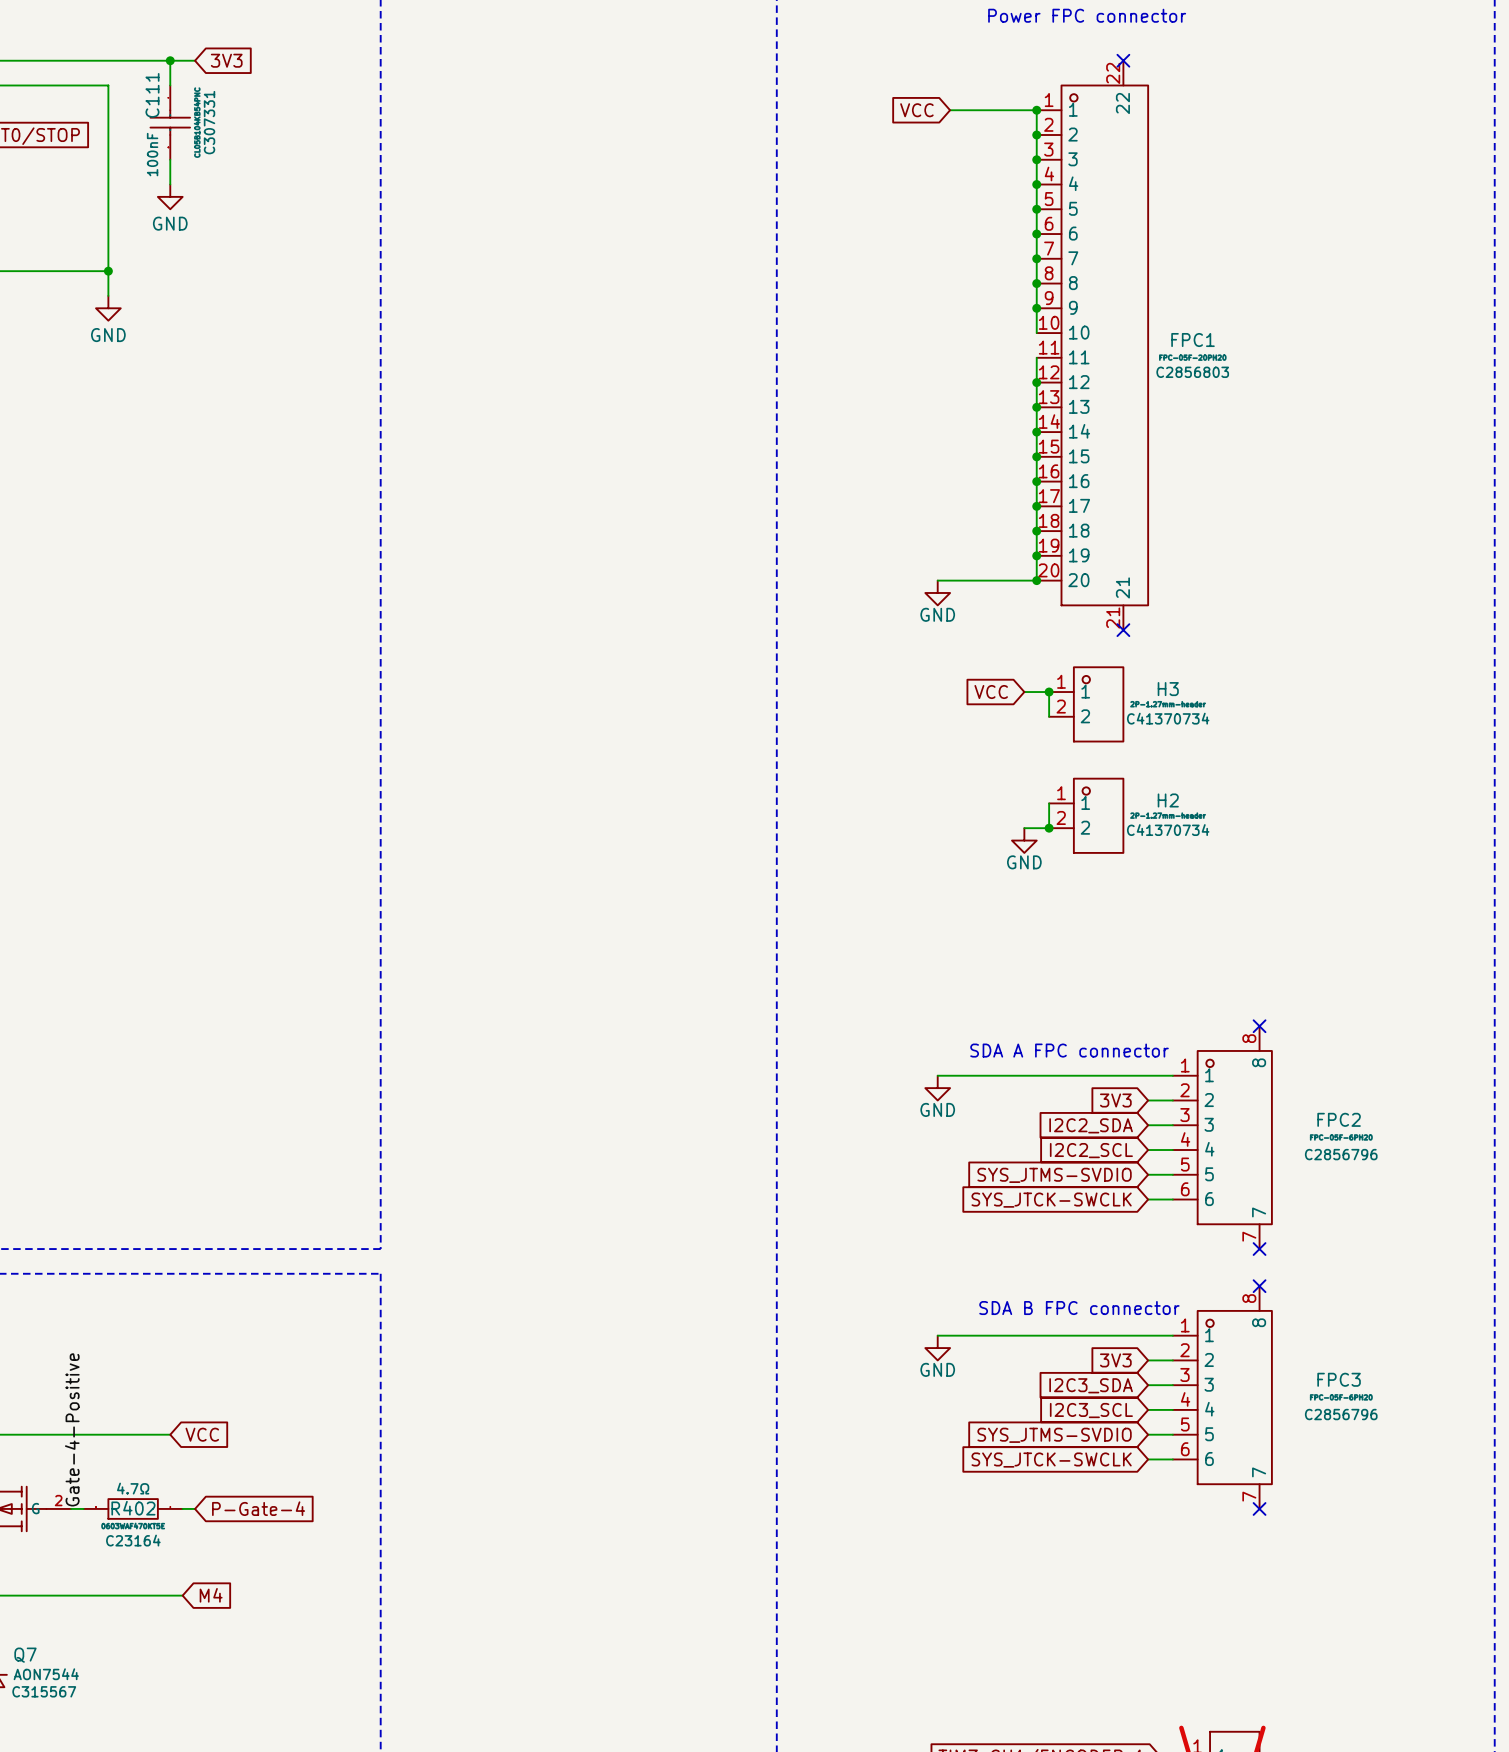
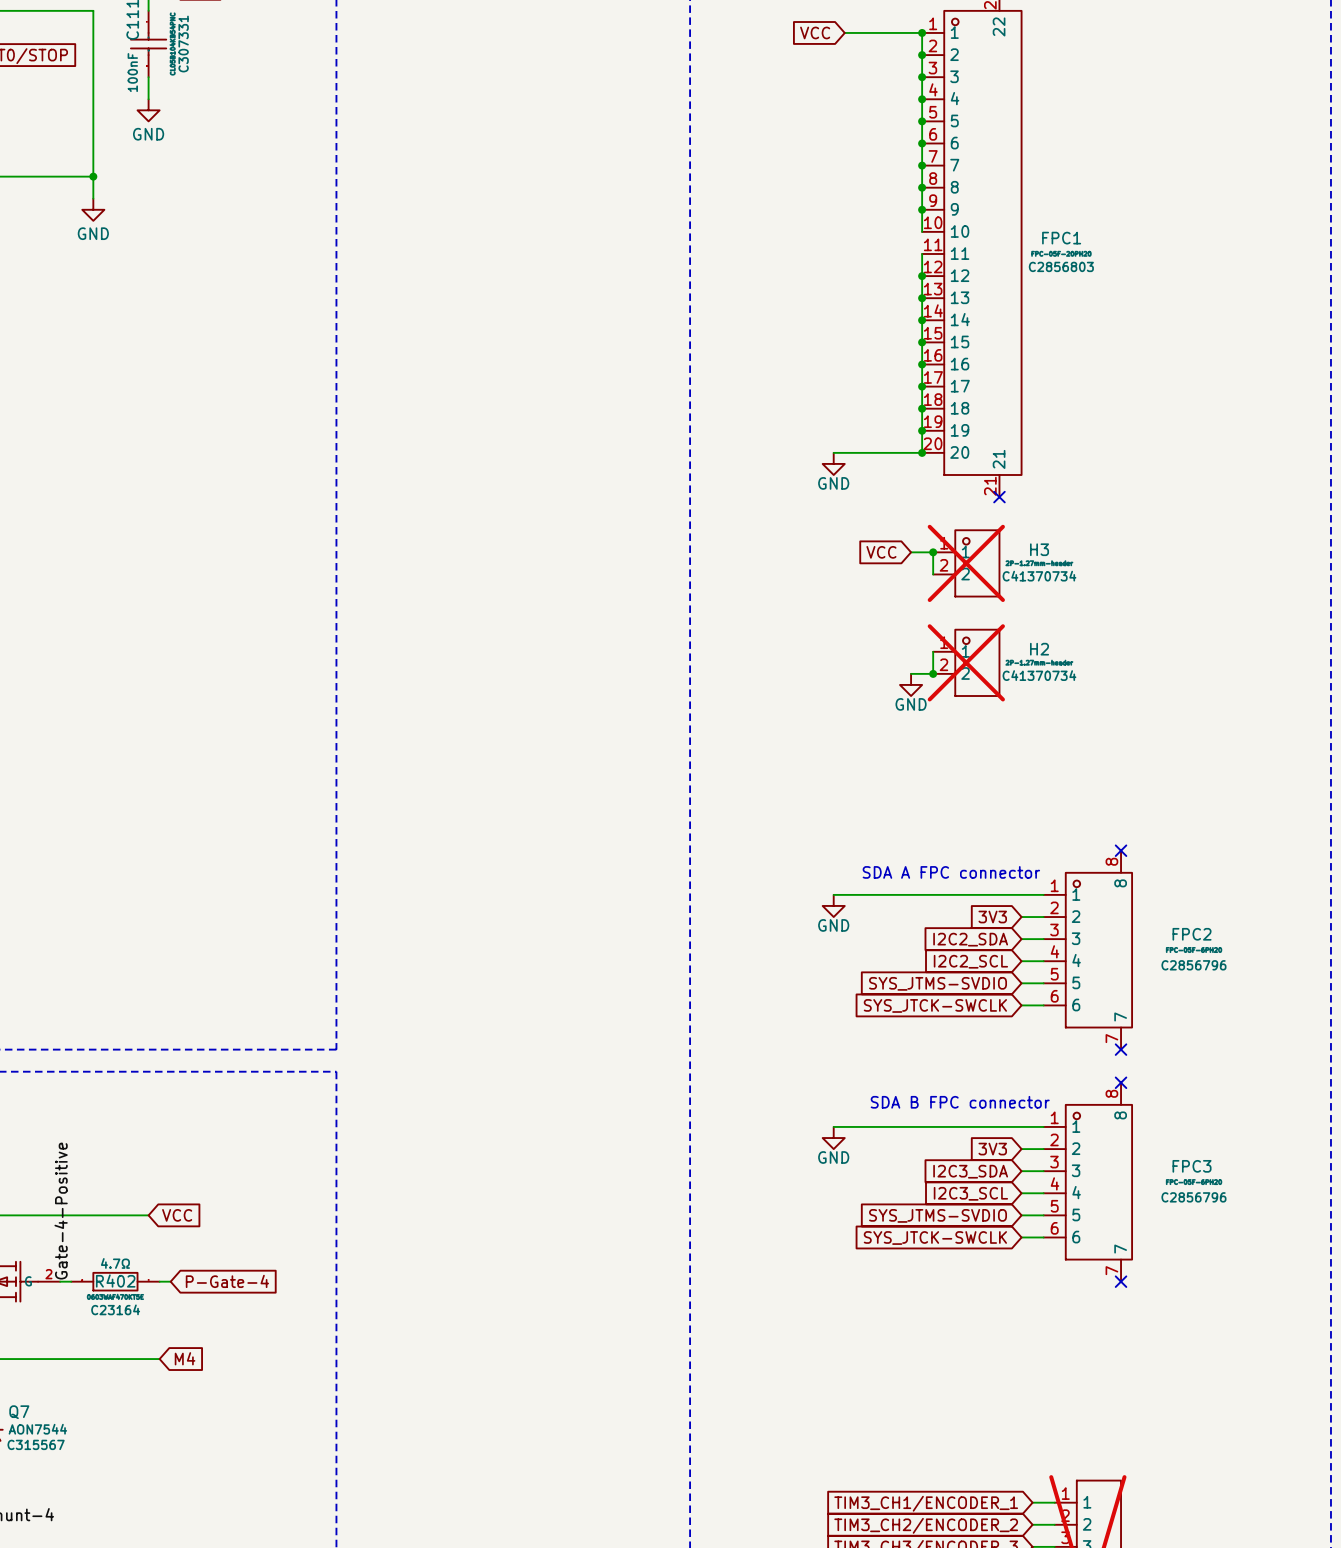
H3 do-not-place cross: none -> (966, 563)
H2 do-not-place cross: none -> (966, 662)

